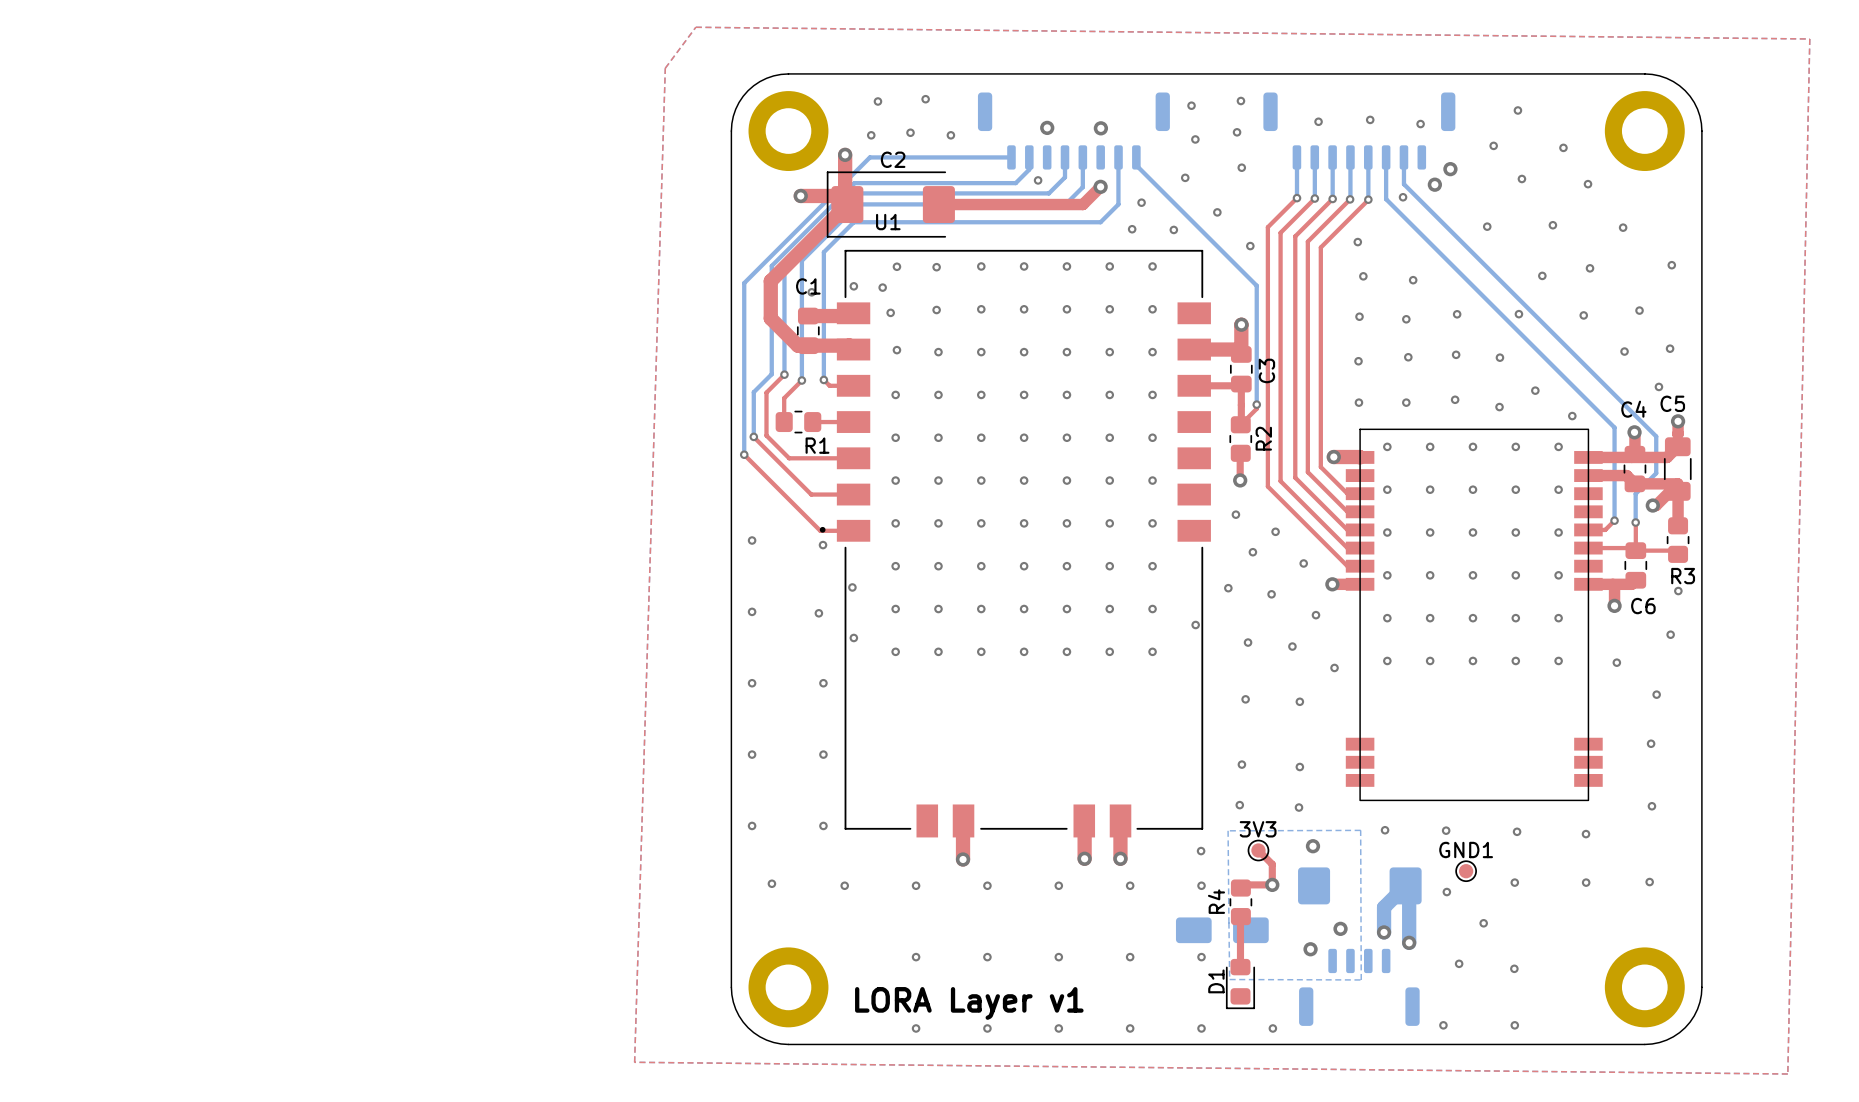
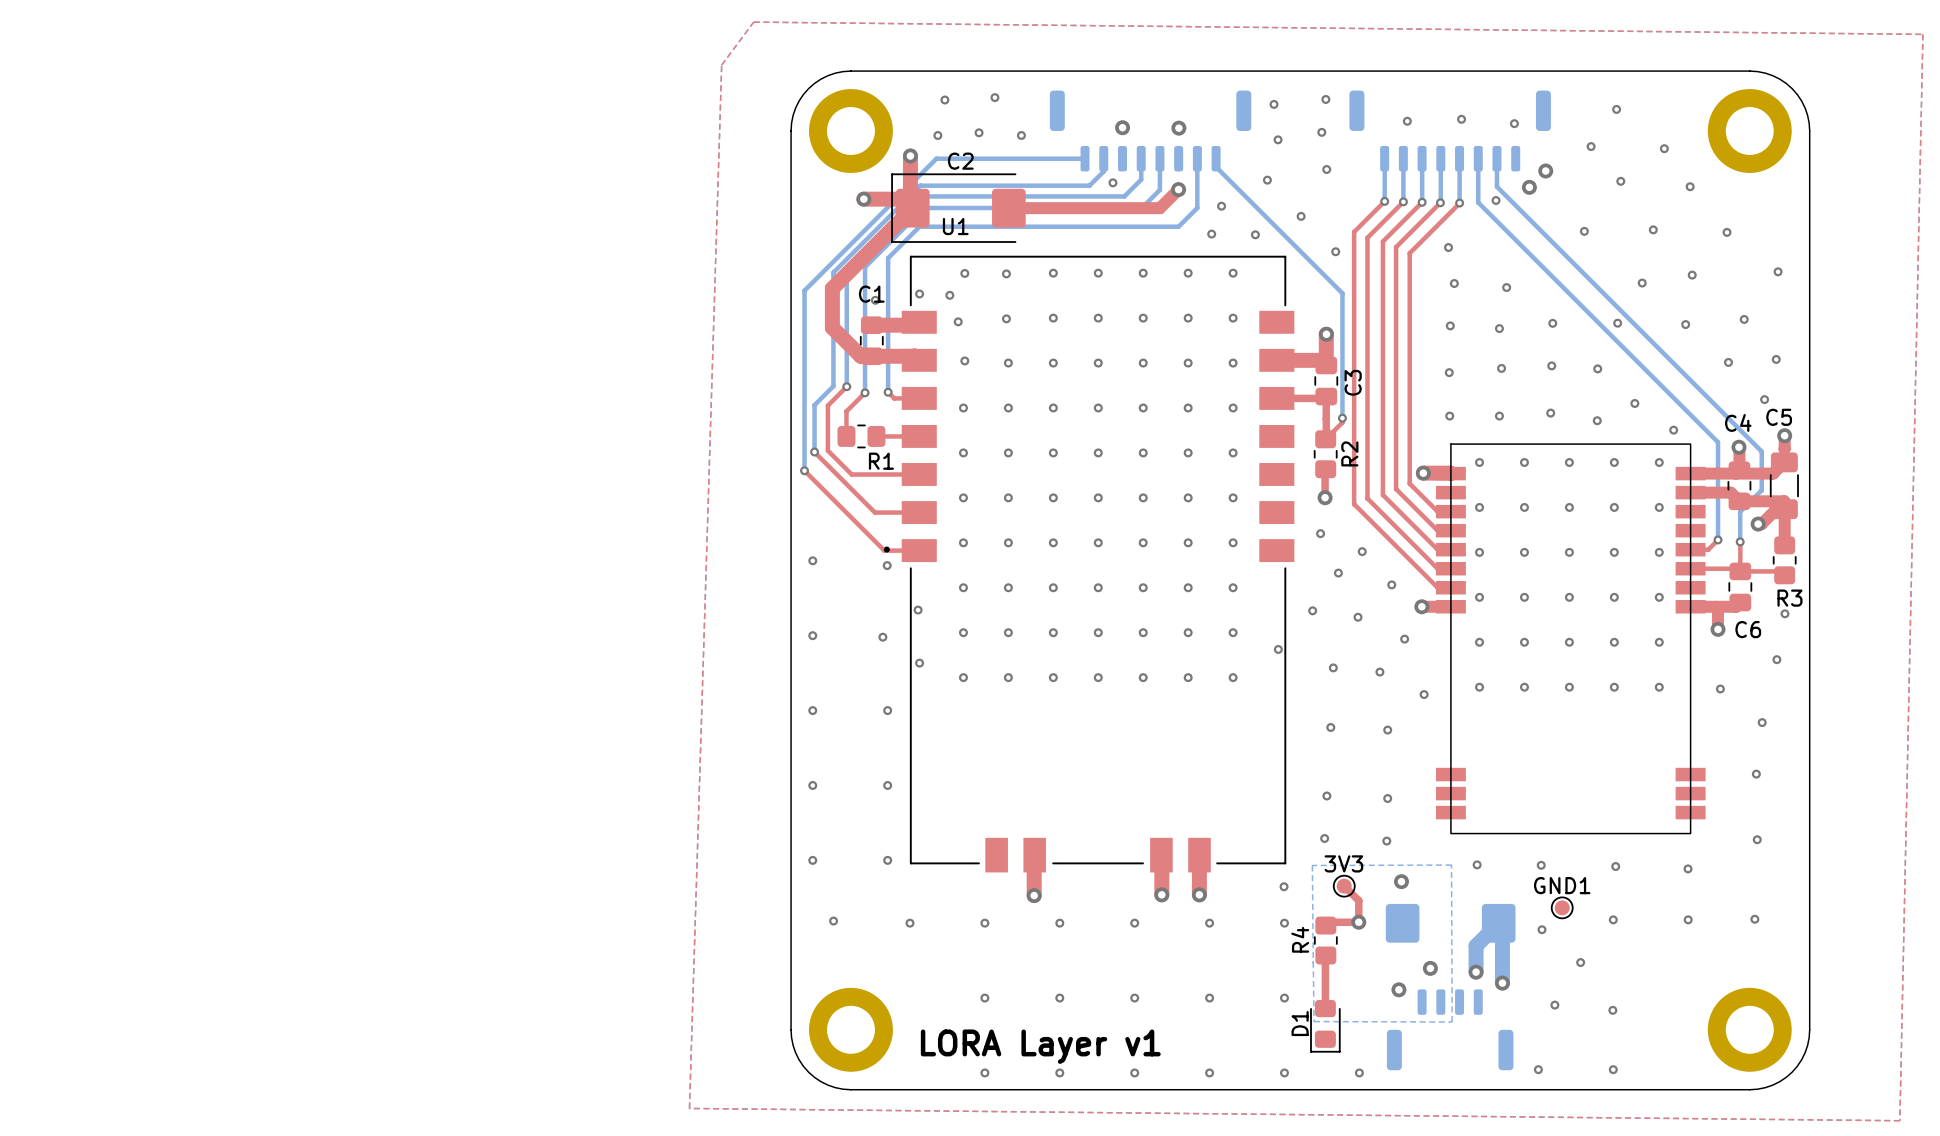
part: (1222, 930) -> none

